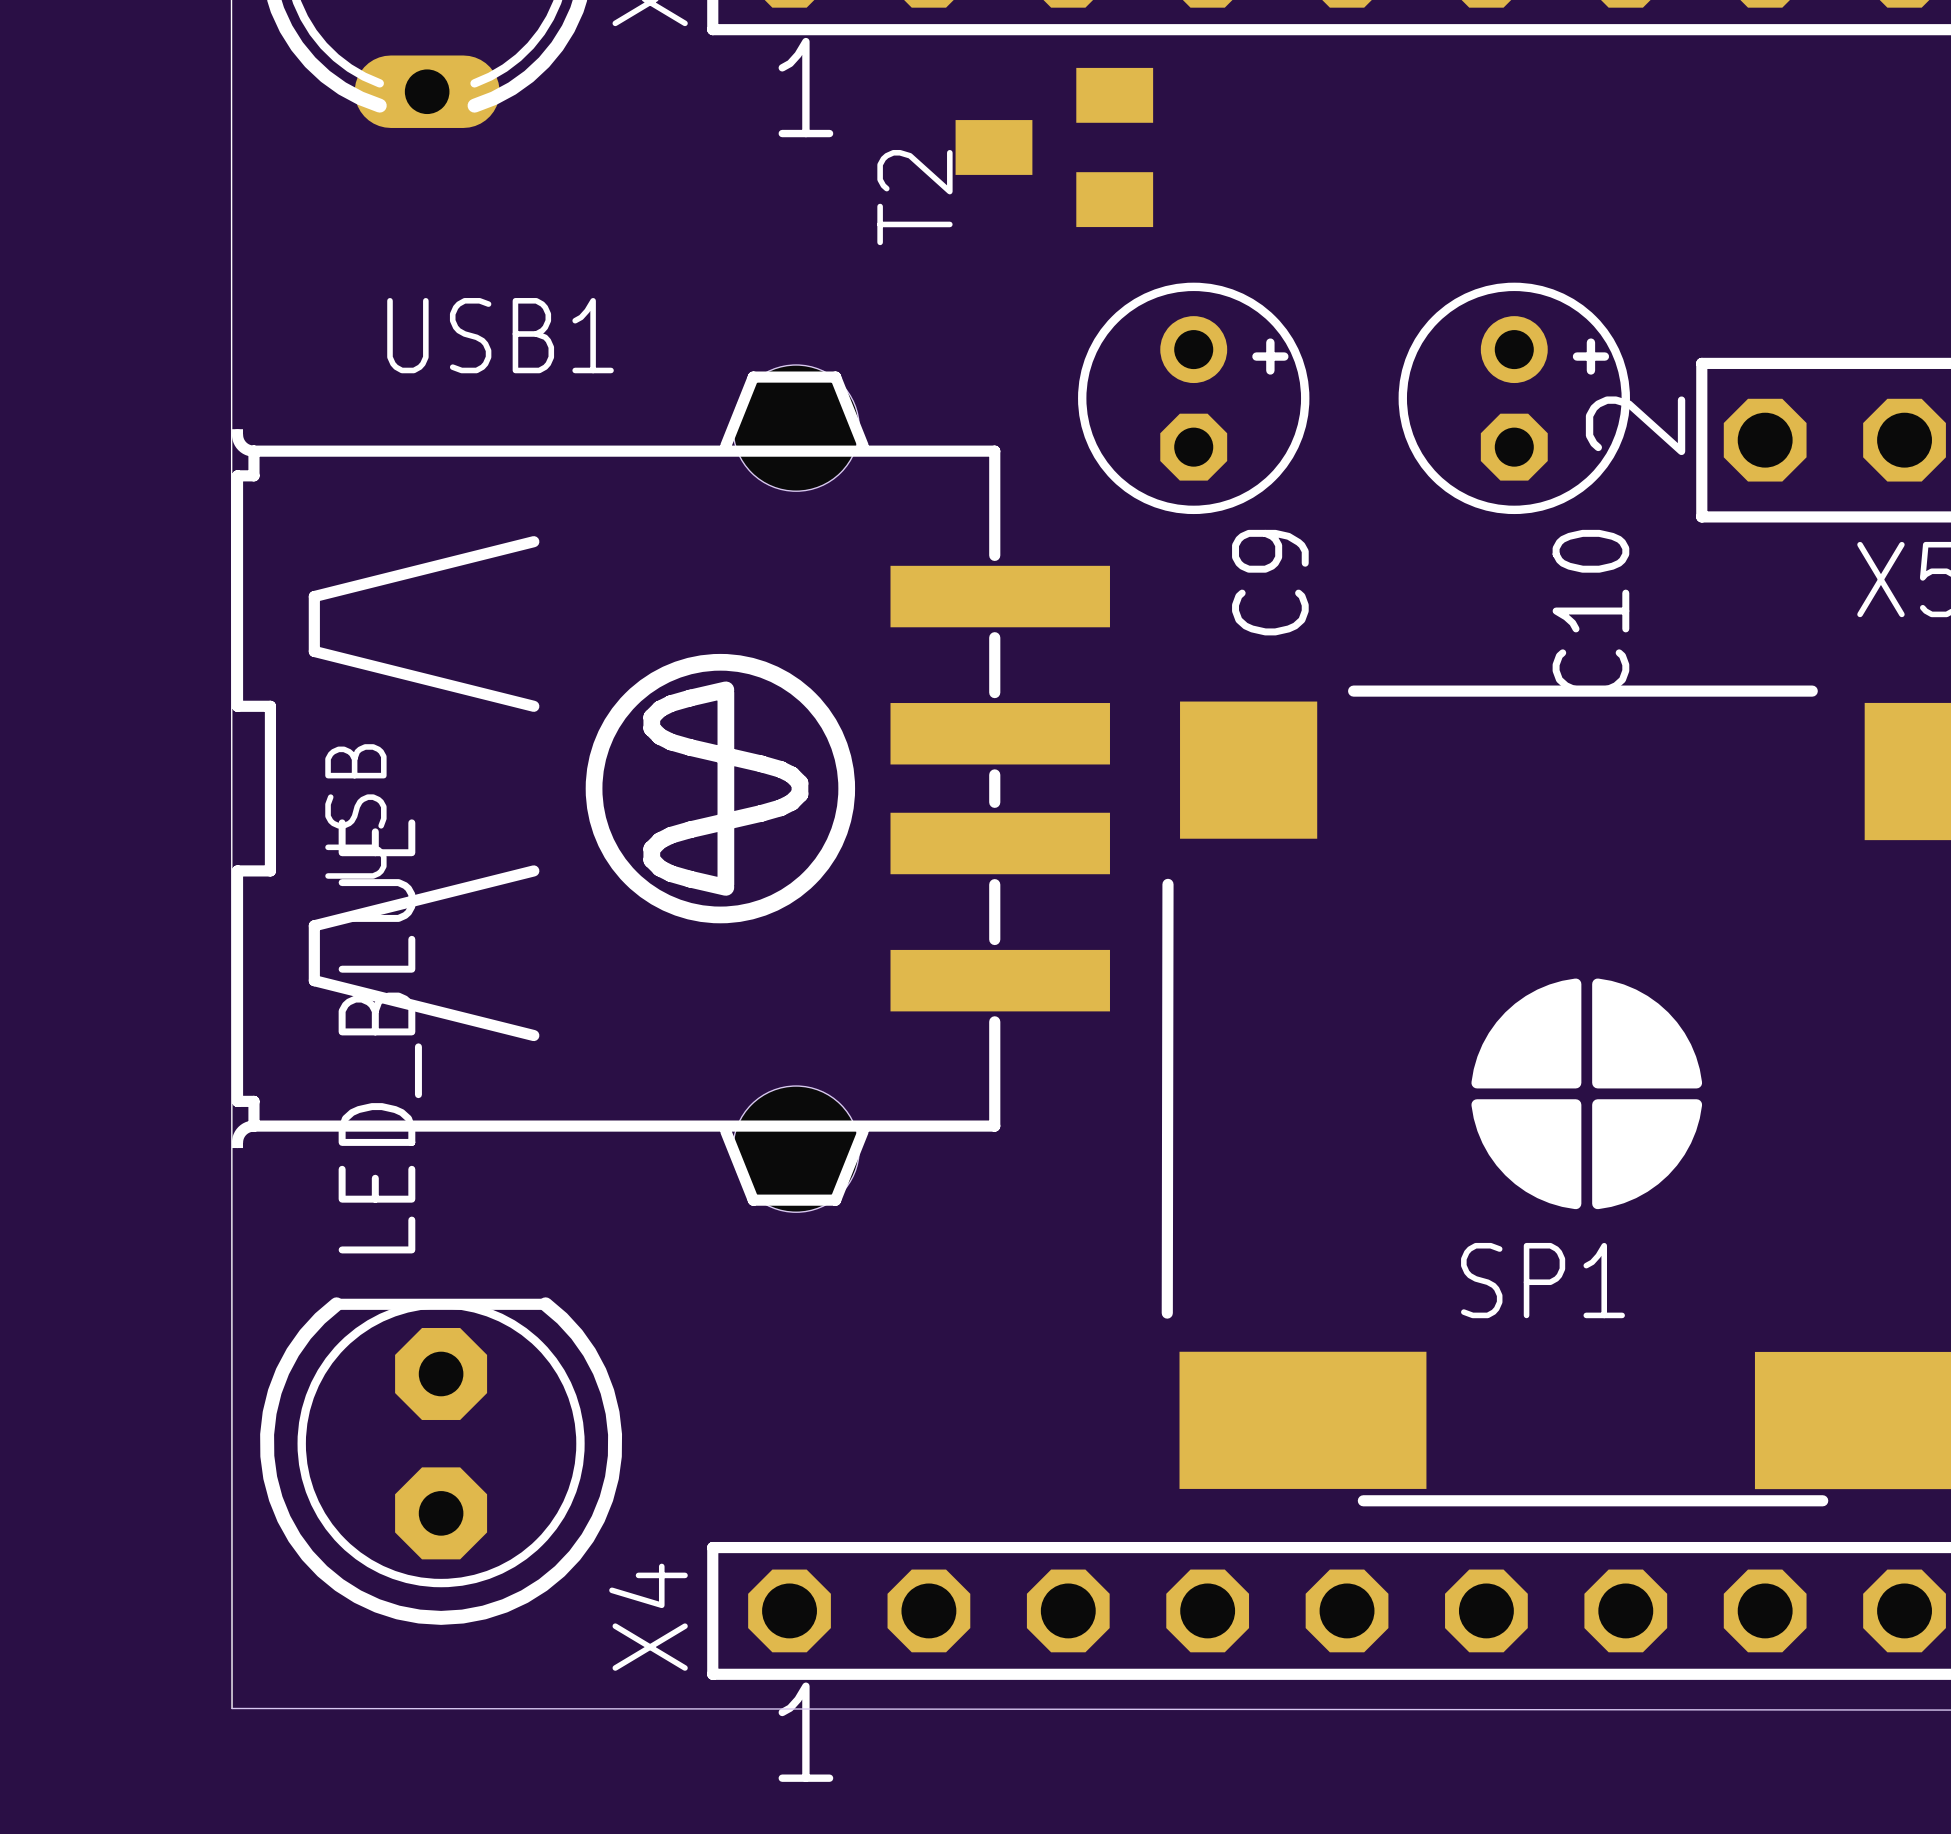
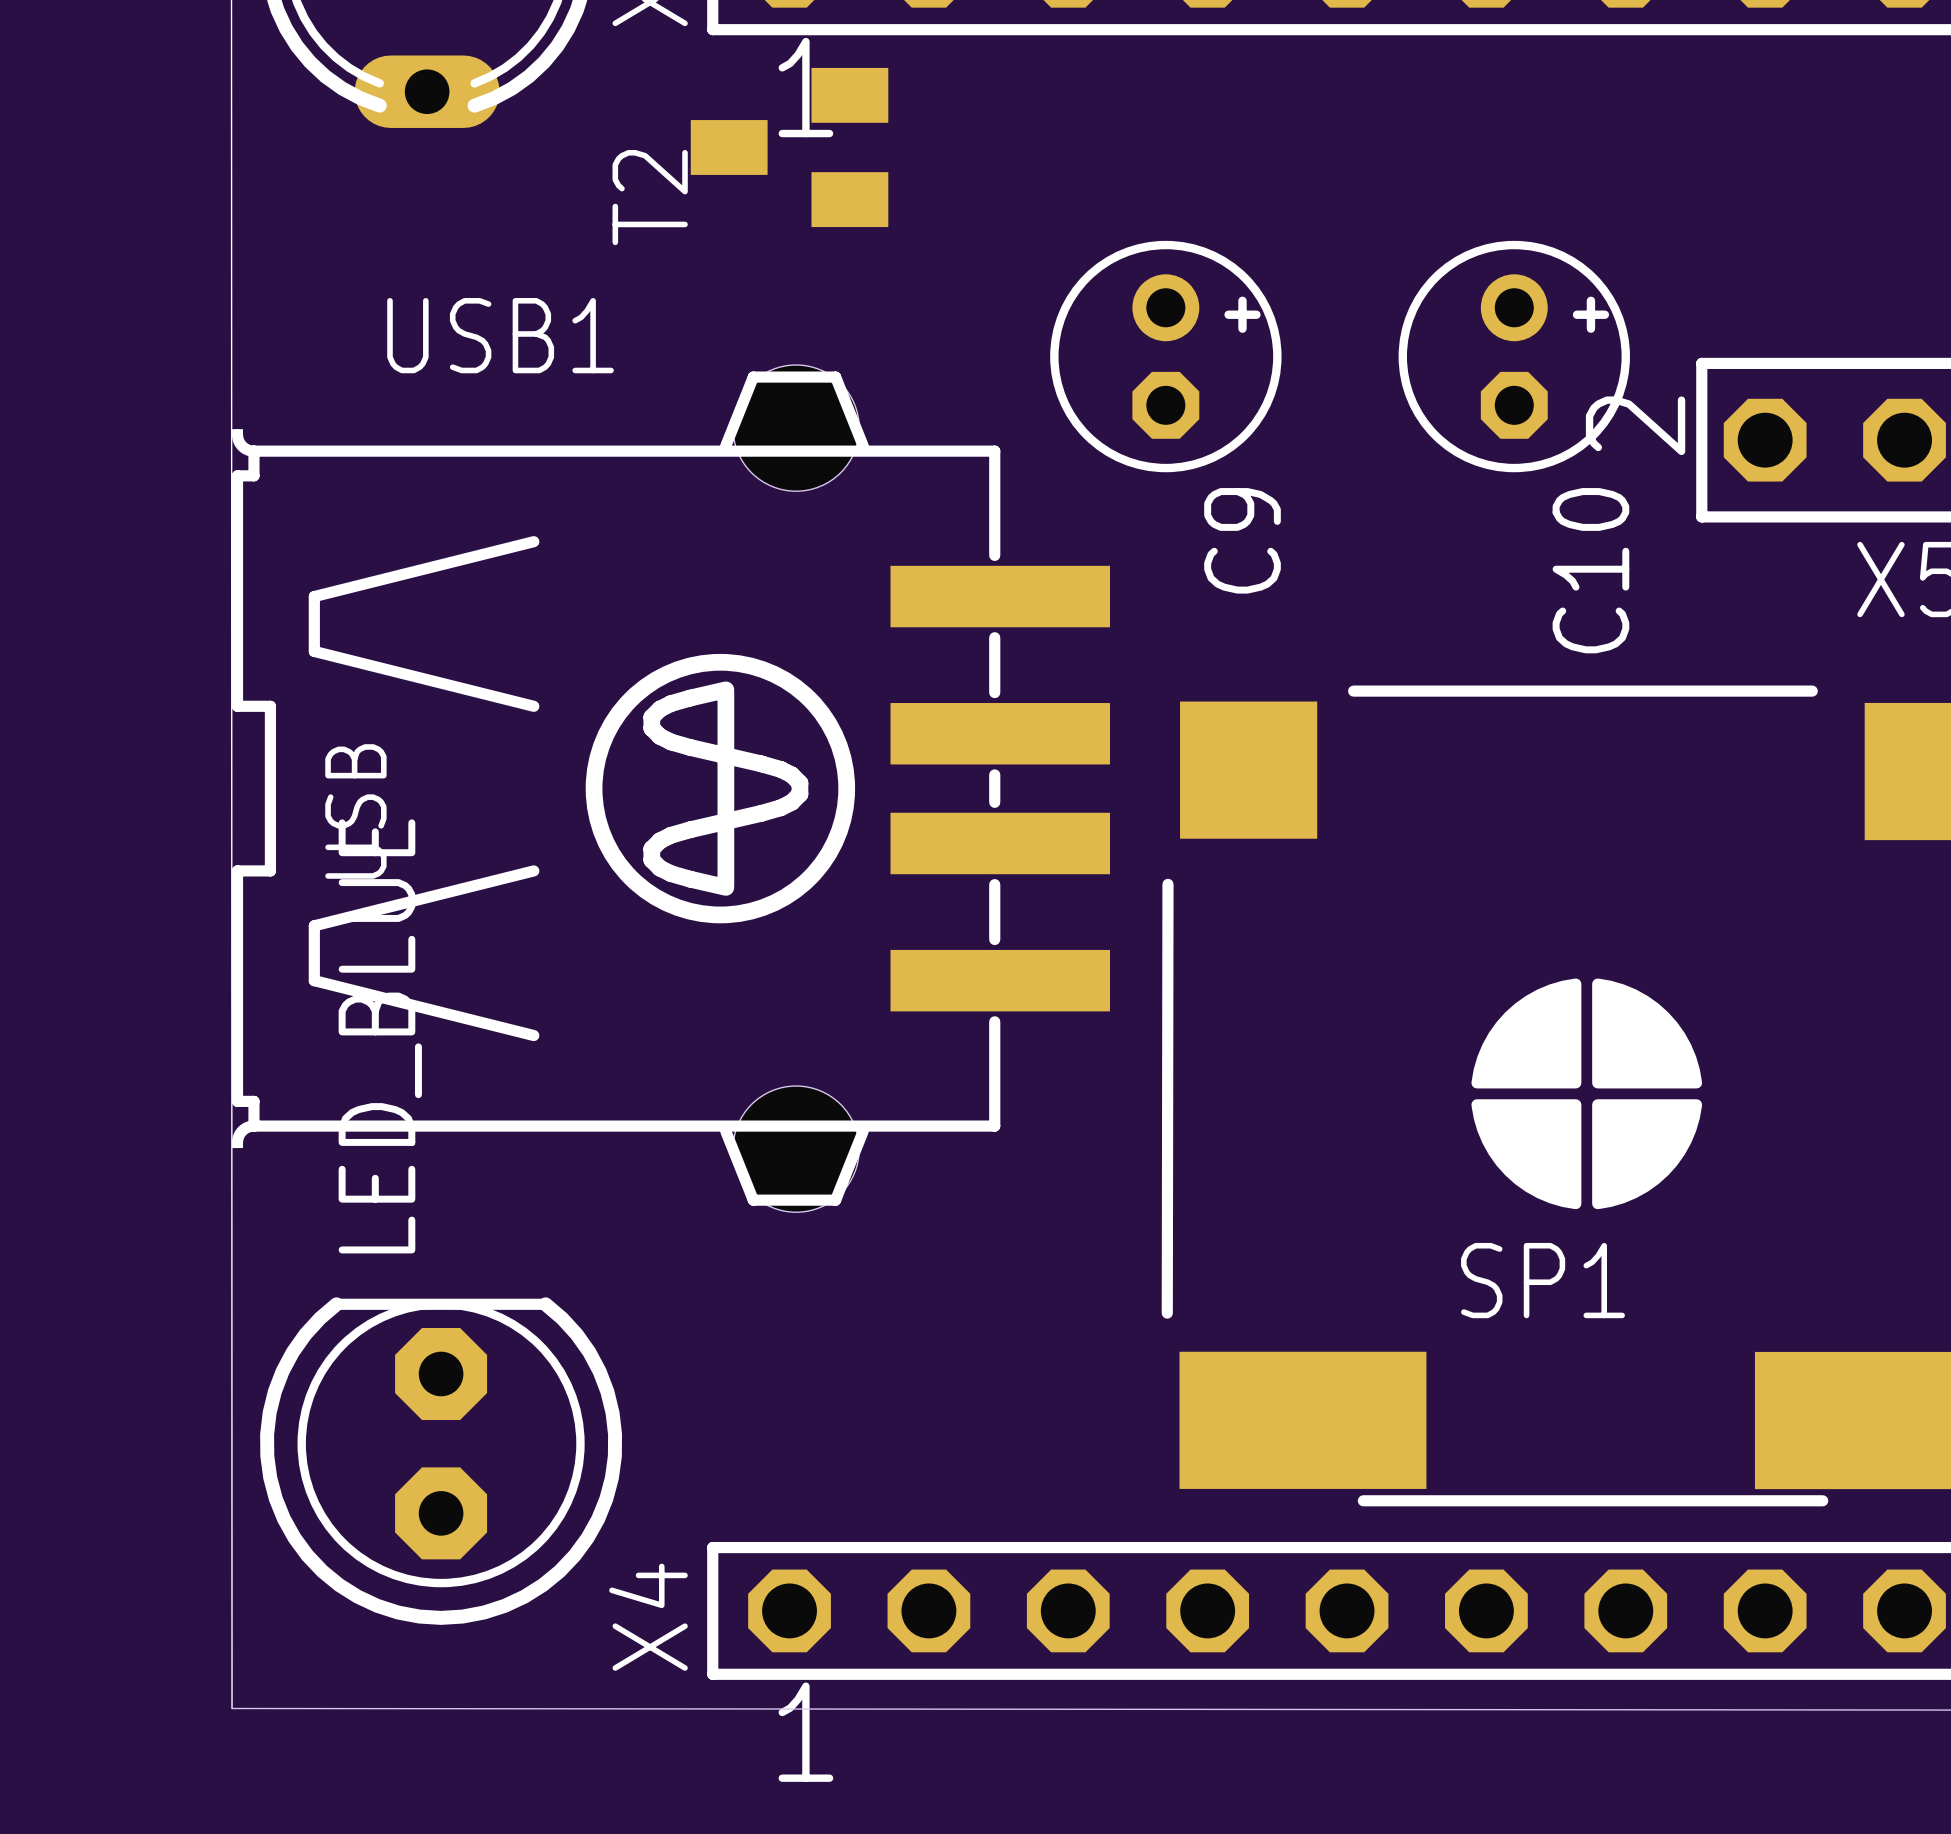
T2 position: (1054, 147) -> (789, 147)
C9 position: (1193, 398) -> (1165, 356)
C10 position: (1514, 398) -> (1514, 356)

